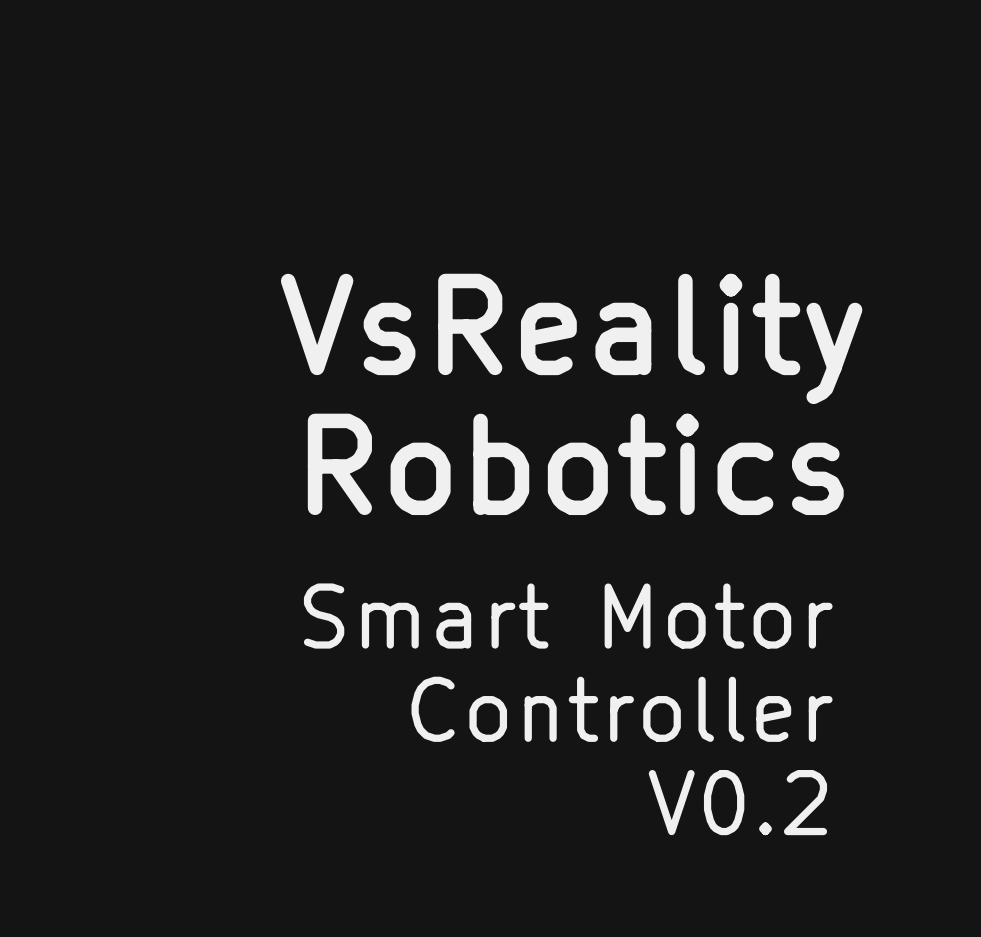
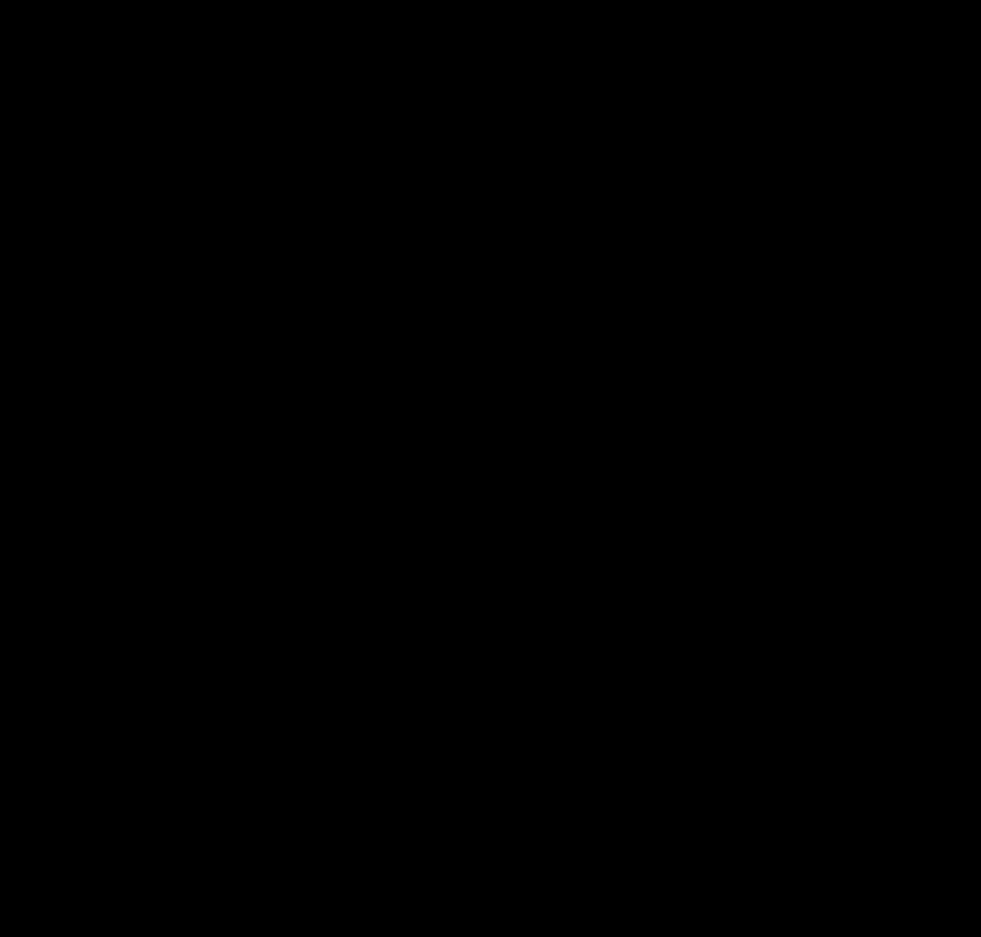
text: VsReality (571, 338) -> none
text: Robotics (575, 464) -> none
text: Smart Motor (568, 616) -> none
text: Controller (622, 709) -> none
text: V0.2 (737, 802) -> none

